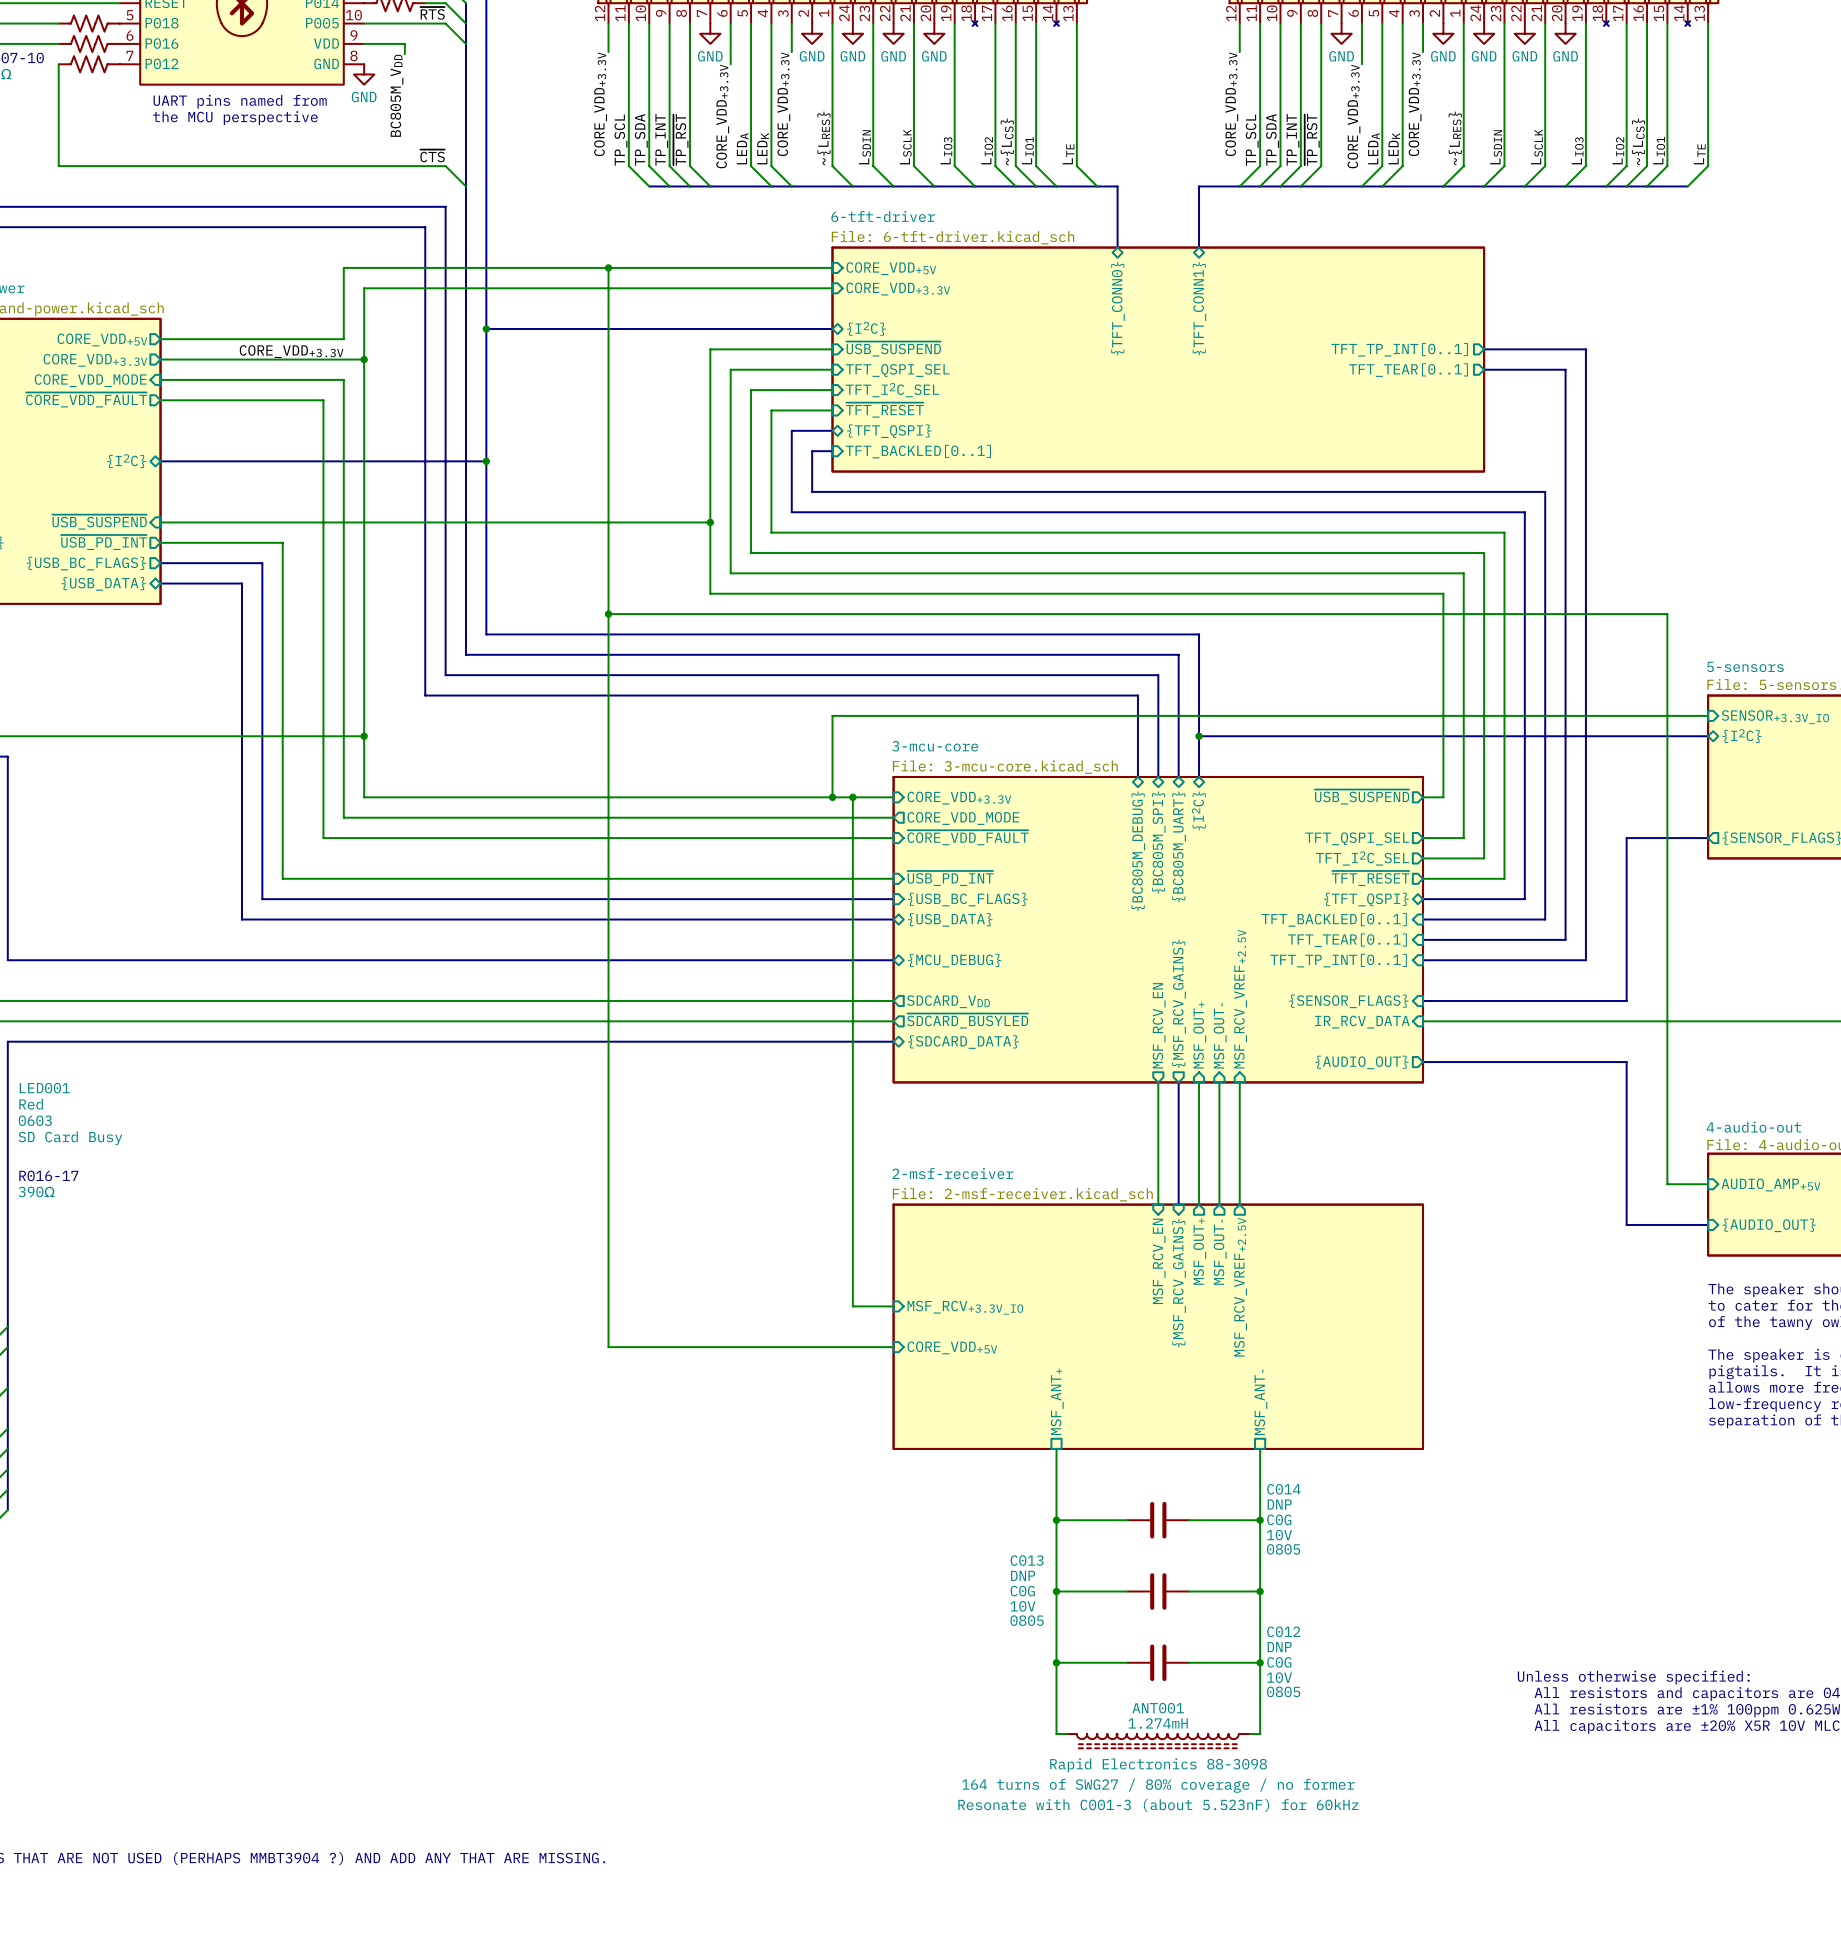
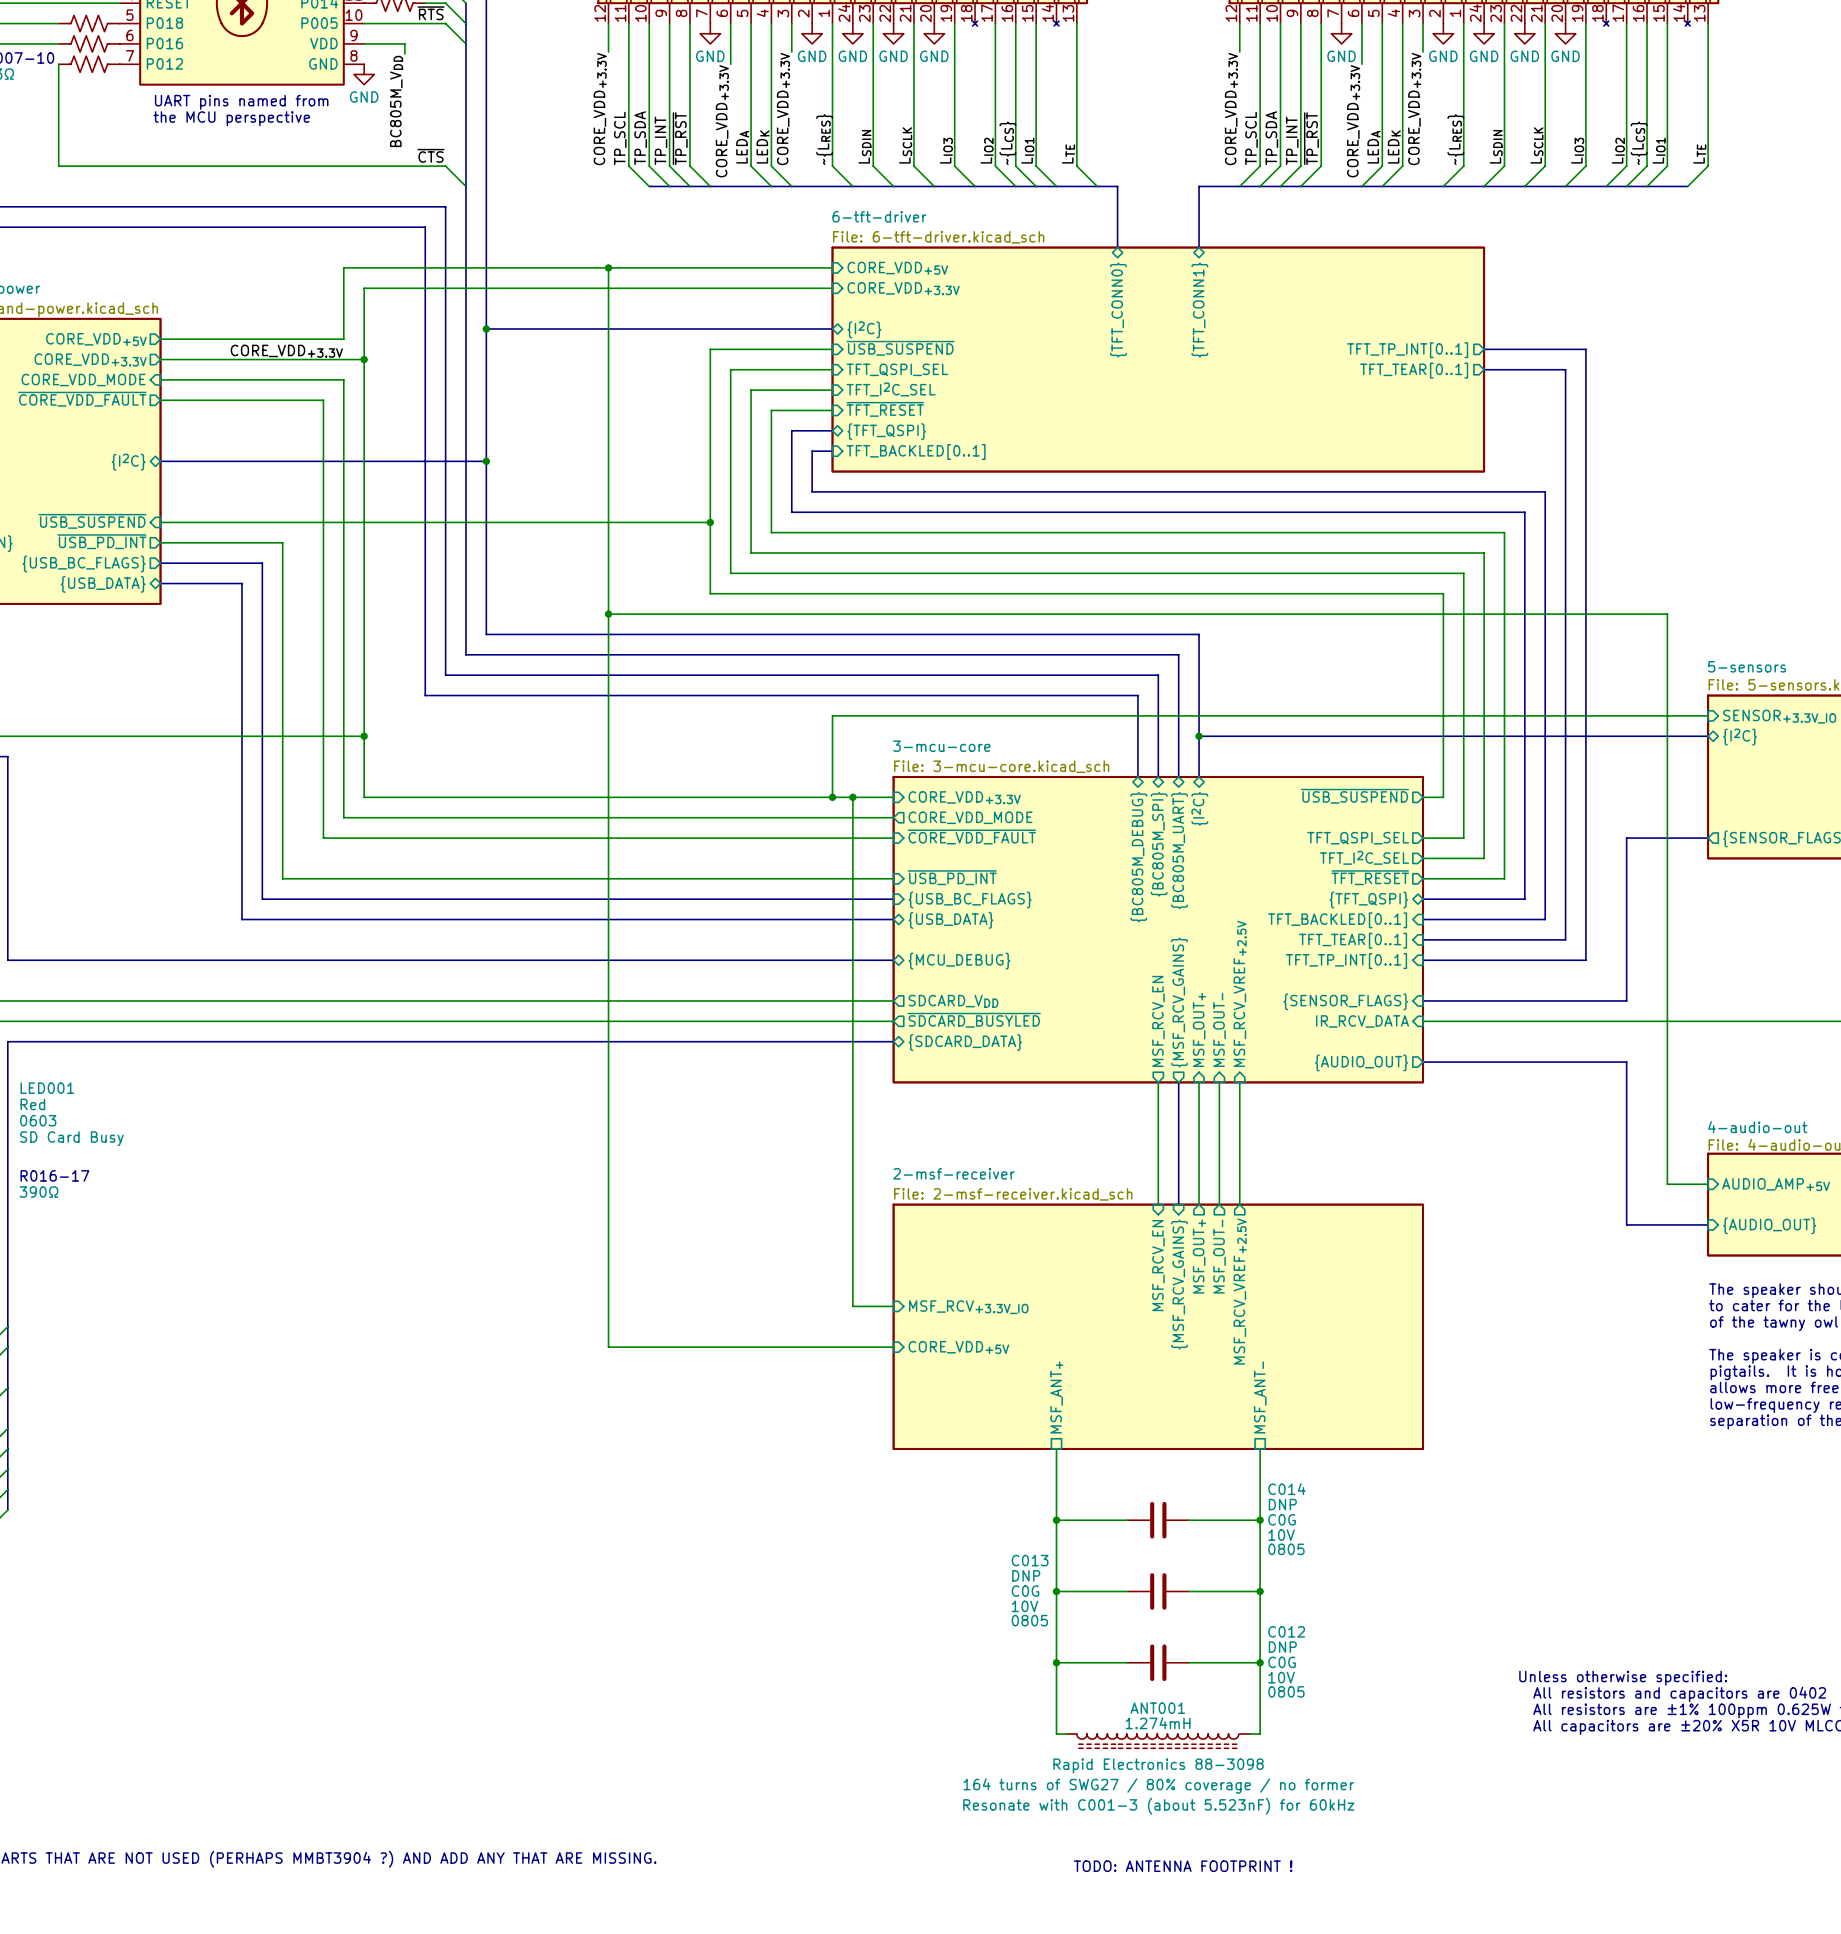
text: none -> TODO: ANTENNA FOOTPRINT ! (1183, 1866)

